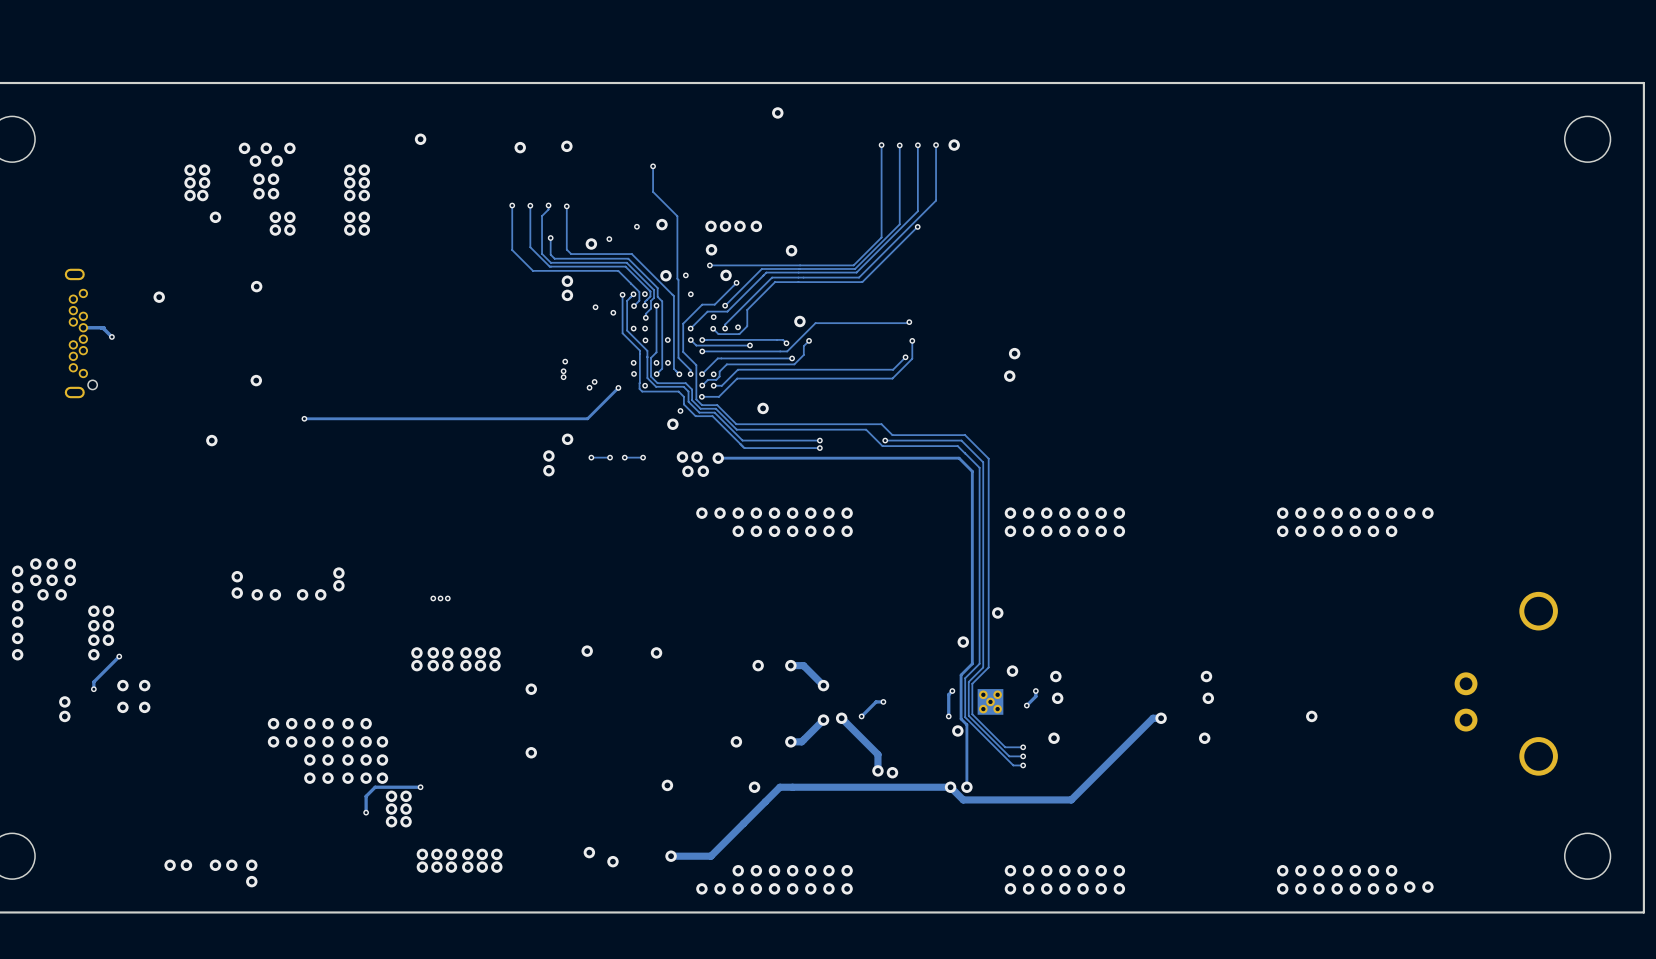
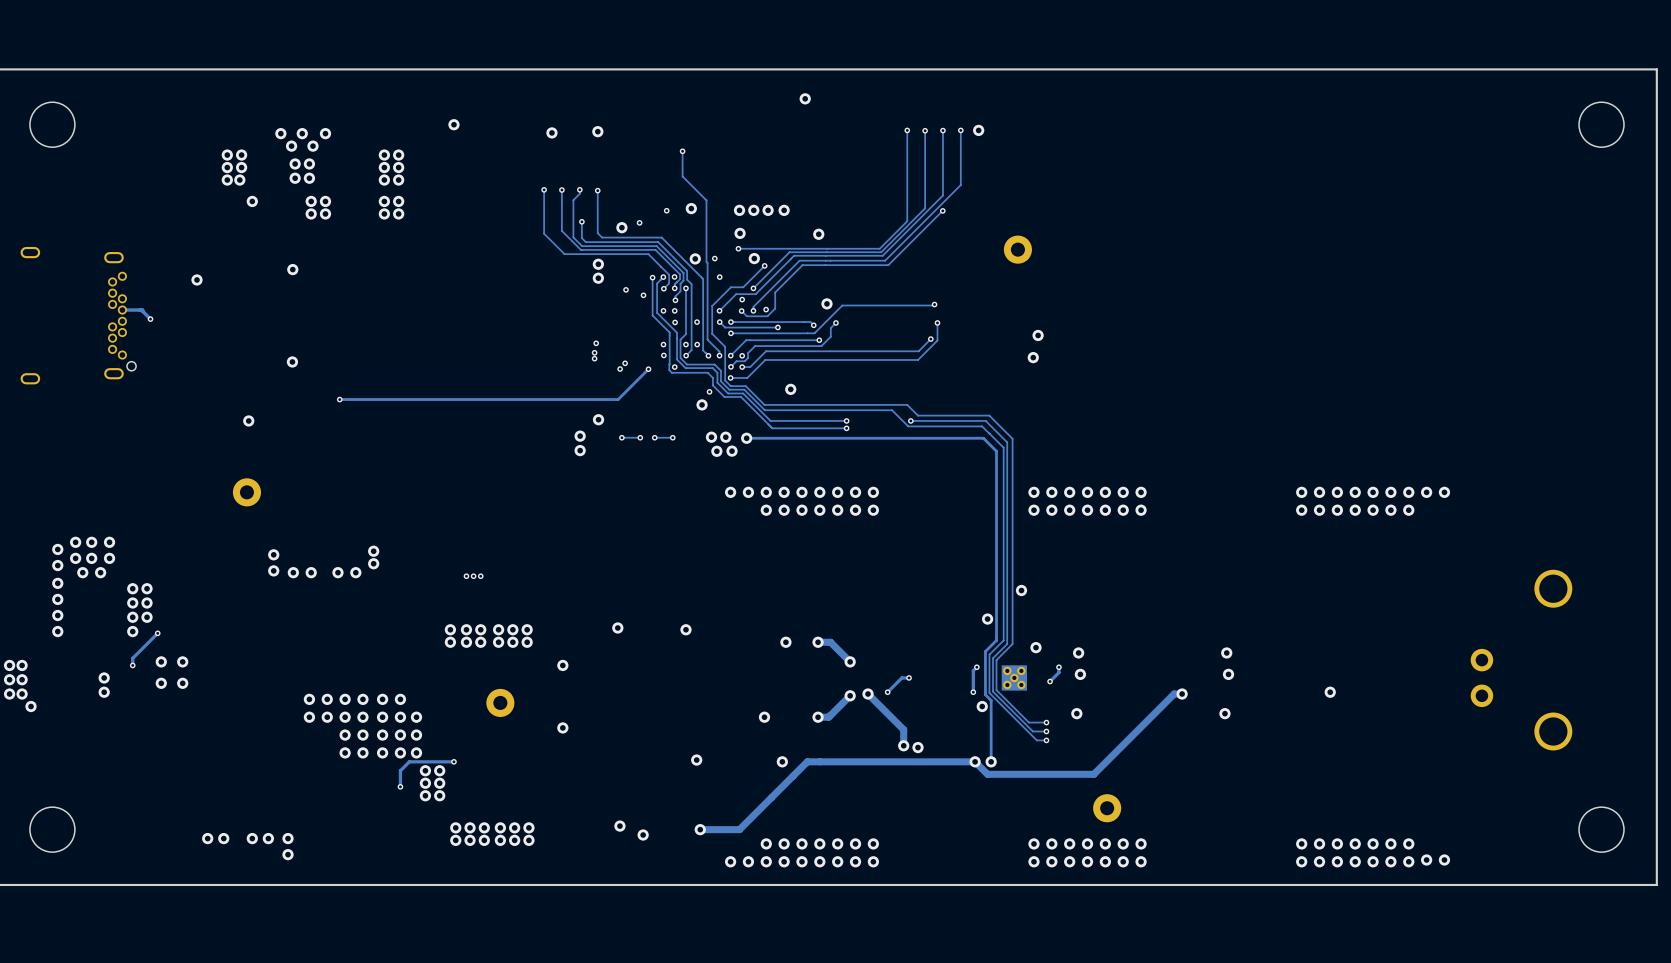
part: none -> (1017, 249)
part: none -> (246, 492)
part: none -> (500, 702)
part: none -> (1107, 808)

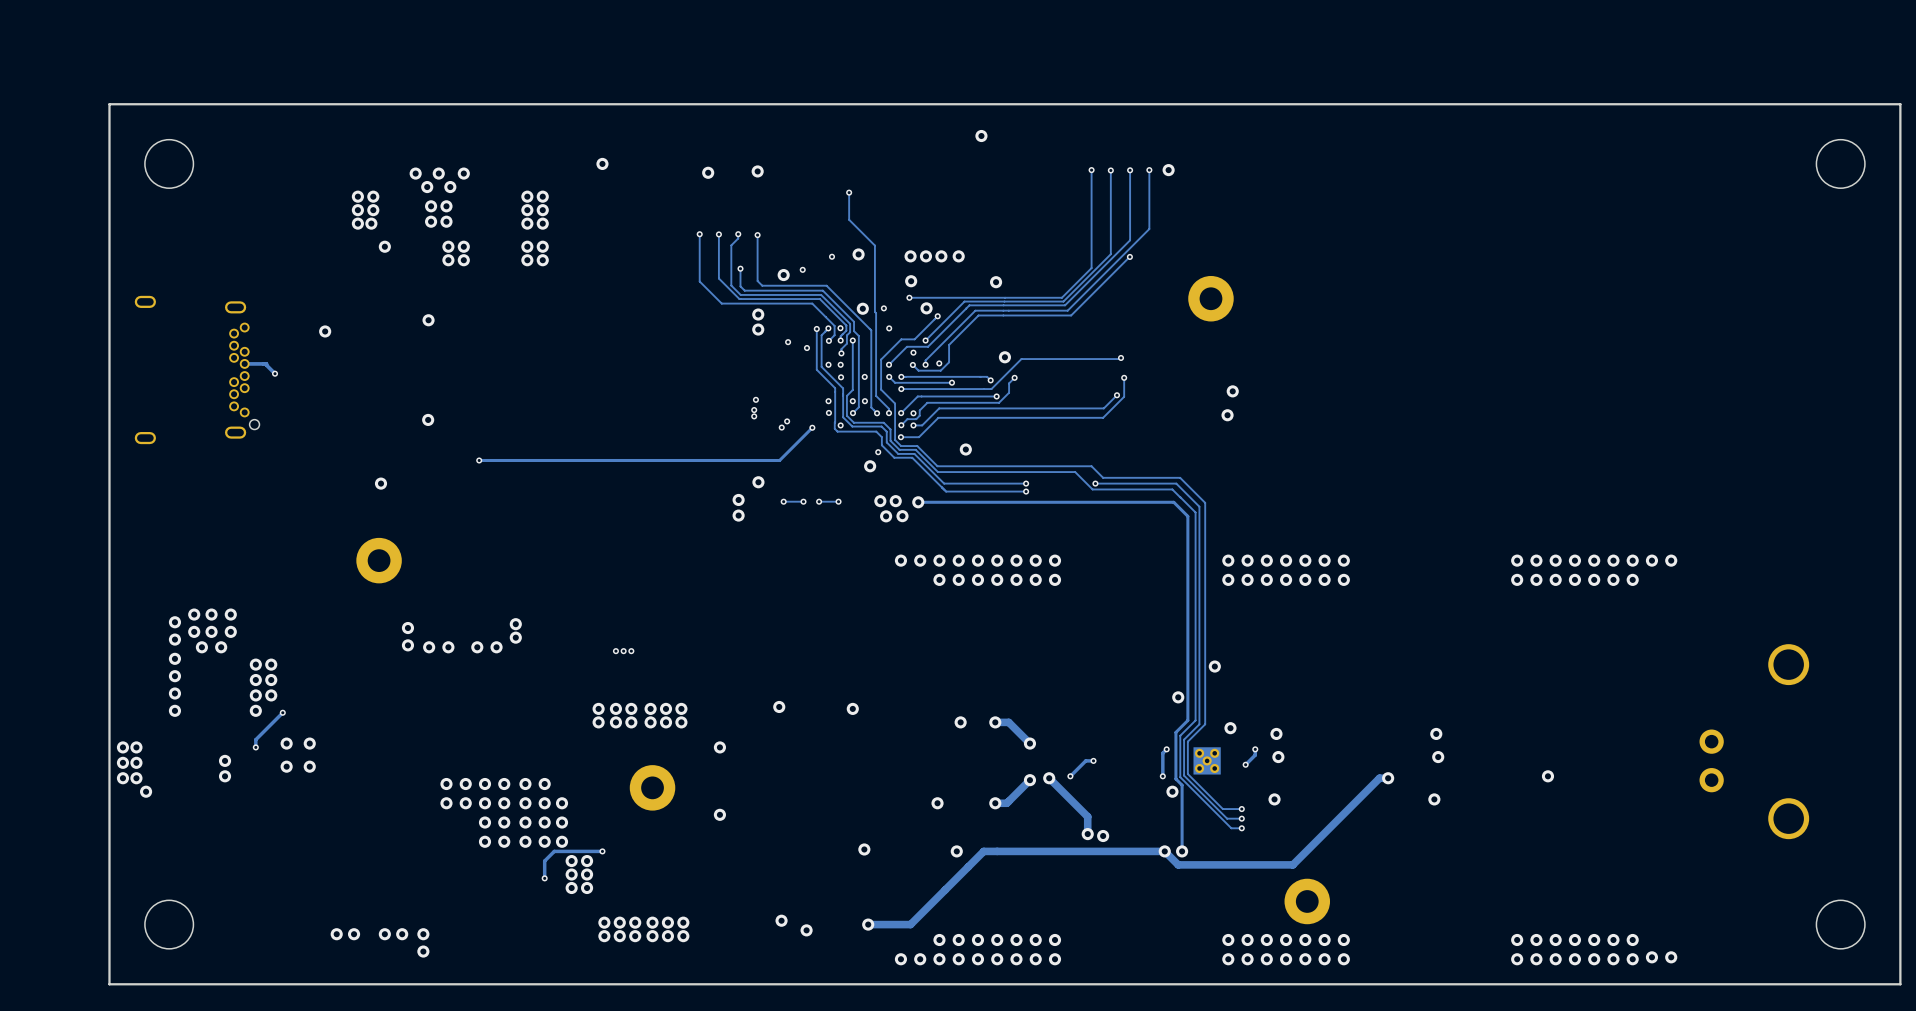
part footprint: [1003, 235, 1032, 264] -> [1188, 275, 1234, 322]
part footprint: [232, 478, 262, 507] -> [356, 537, 402, 584]
part footprint: [486, 688, 515, 717] -> [629, 765, 676, 811]
part footprint: [1093, 794, 1122, 823] -> [1284, 878, 1331, 925]

